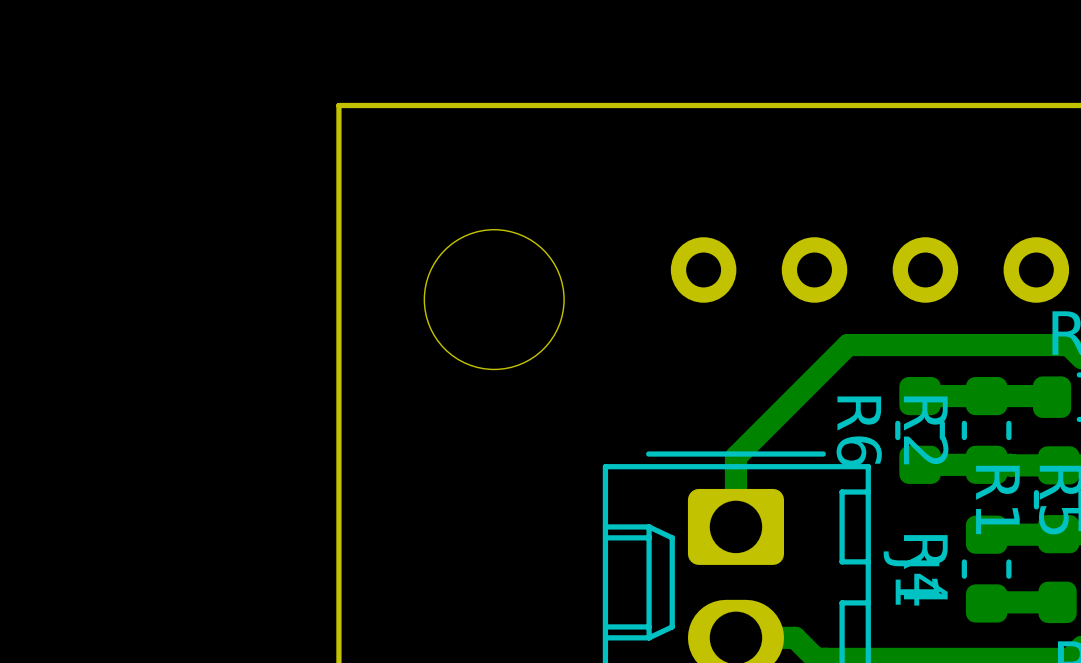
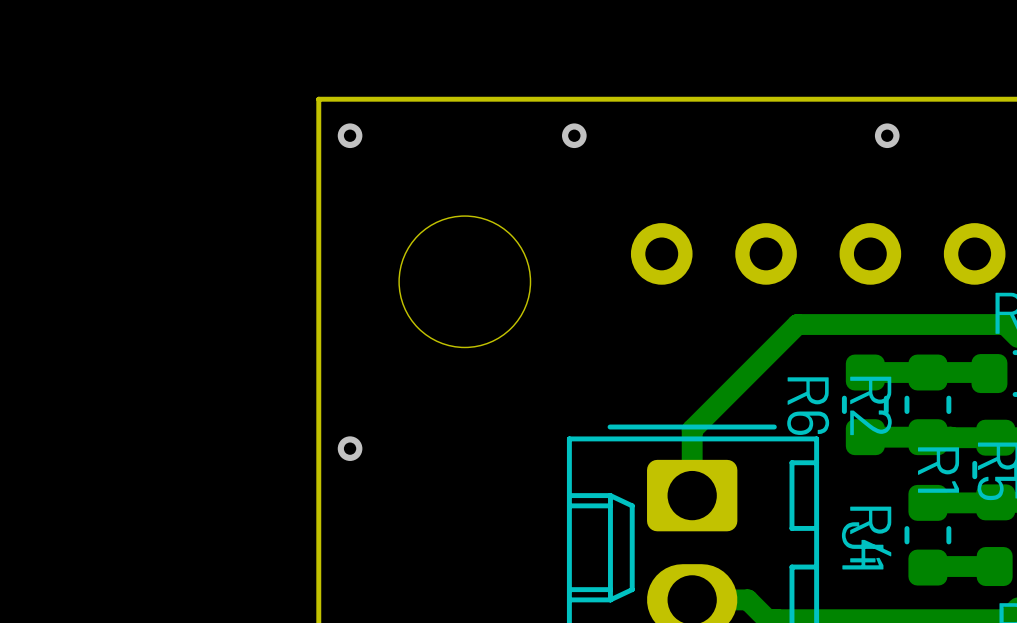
via: none -> (350, 135)
via: none -> (574, 135)
via: none -> (887, 135)
via: none -> (350, 448)

